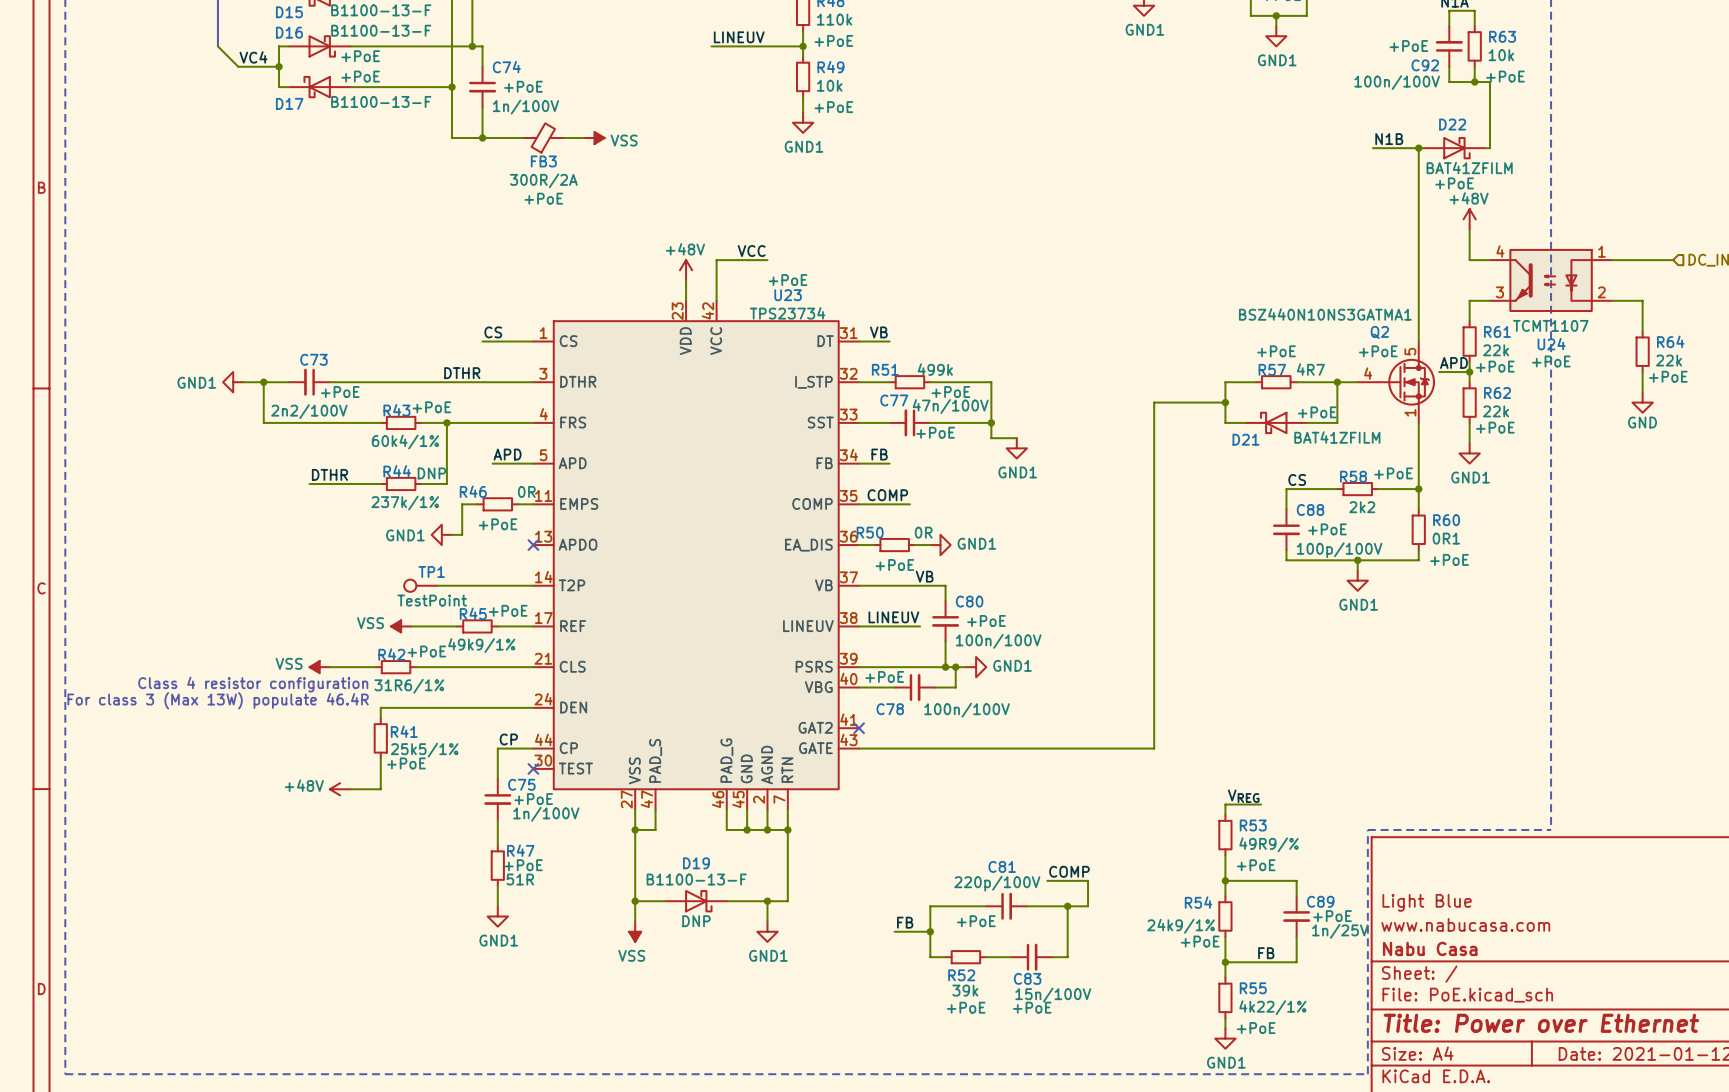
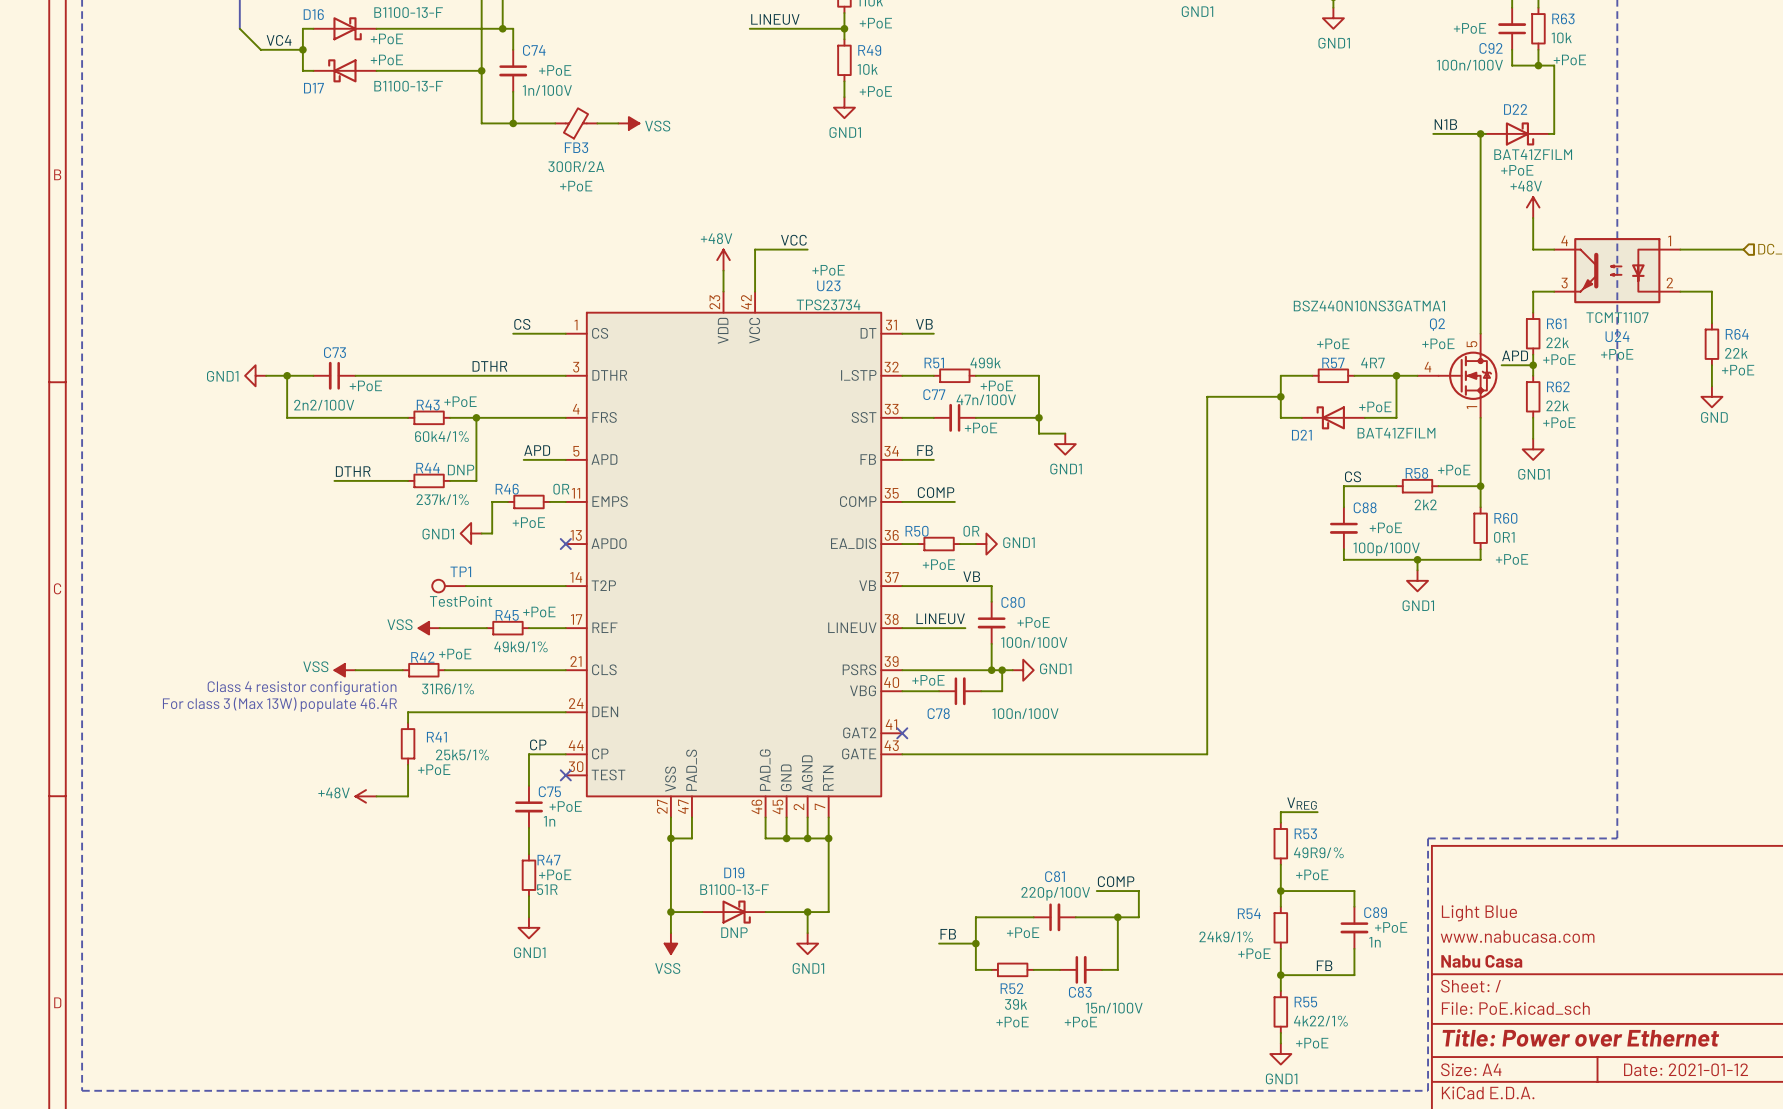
C75 value: 1n/100V (546, 814) -> 1n (549, 821)
C89 value: 1n/25V (1340, 931) -> 1n (1374, 942)

